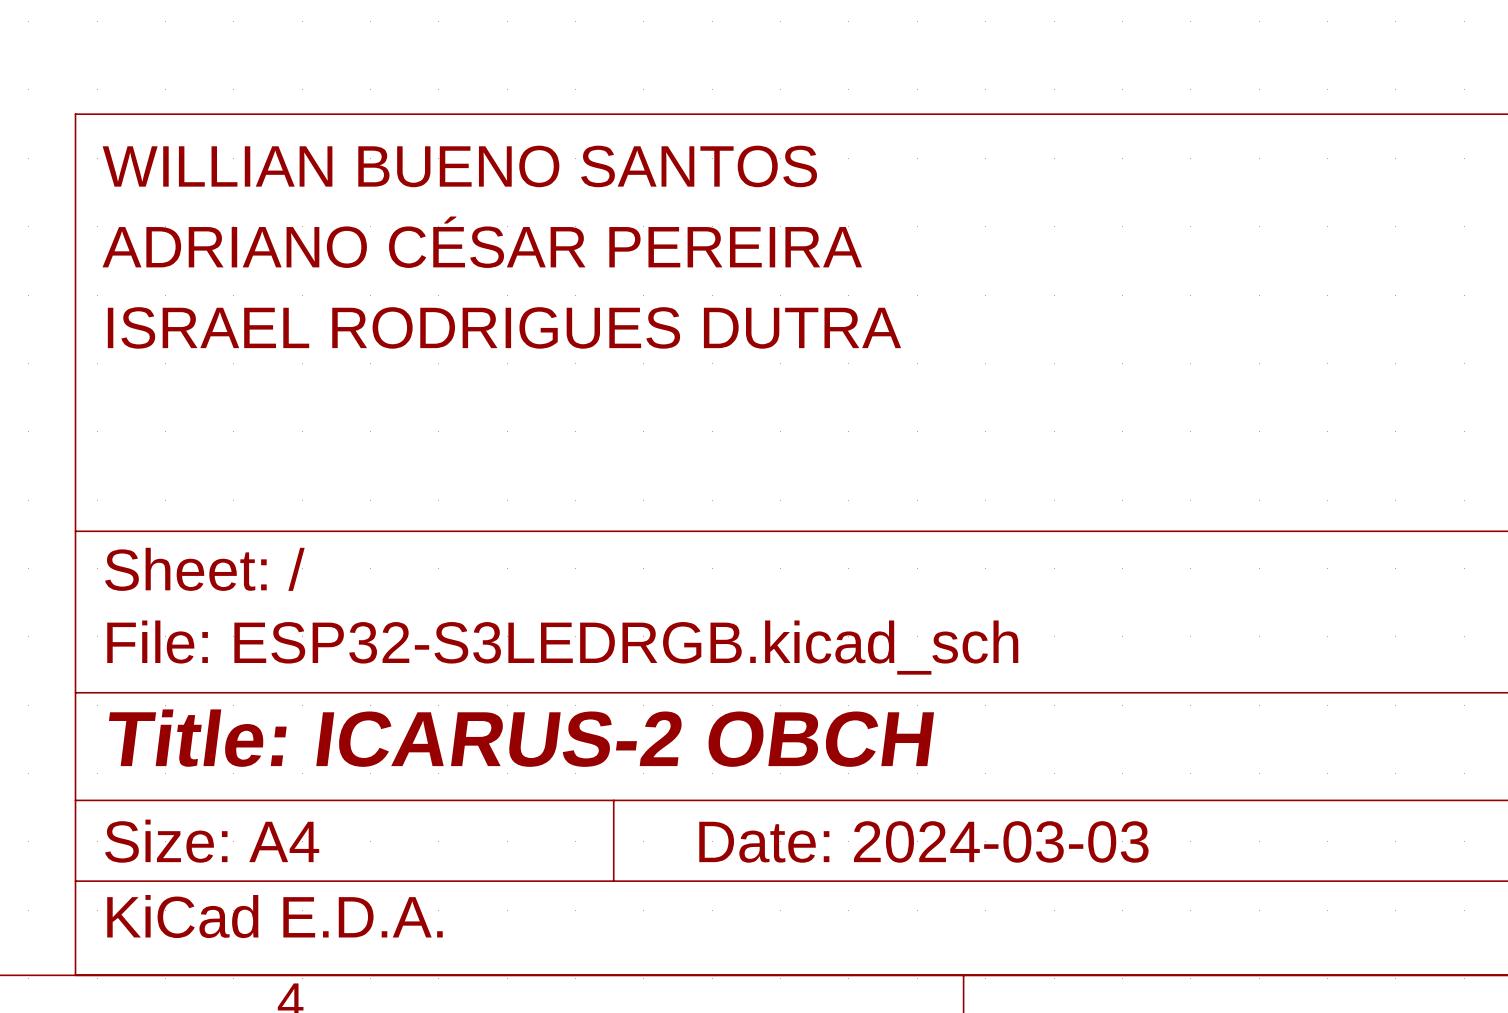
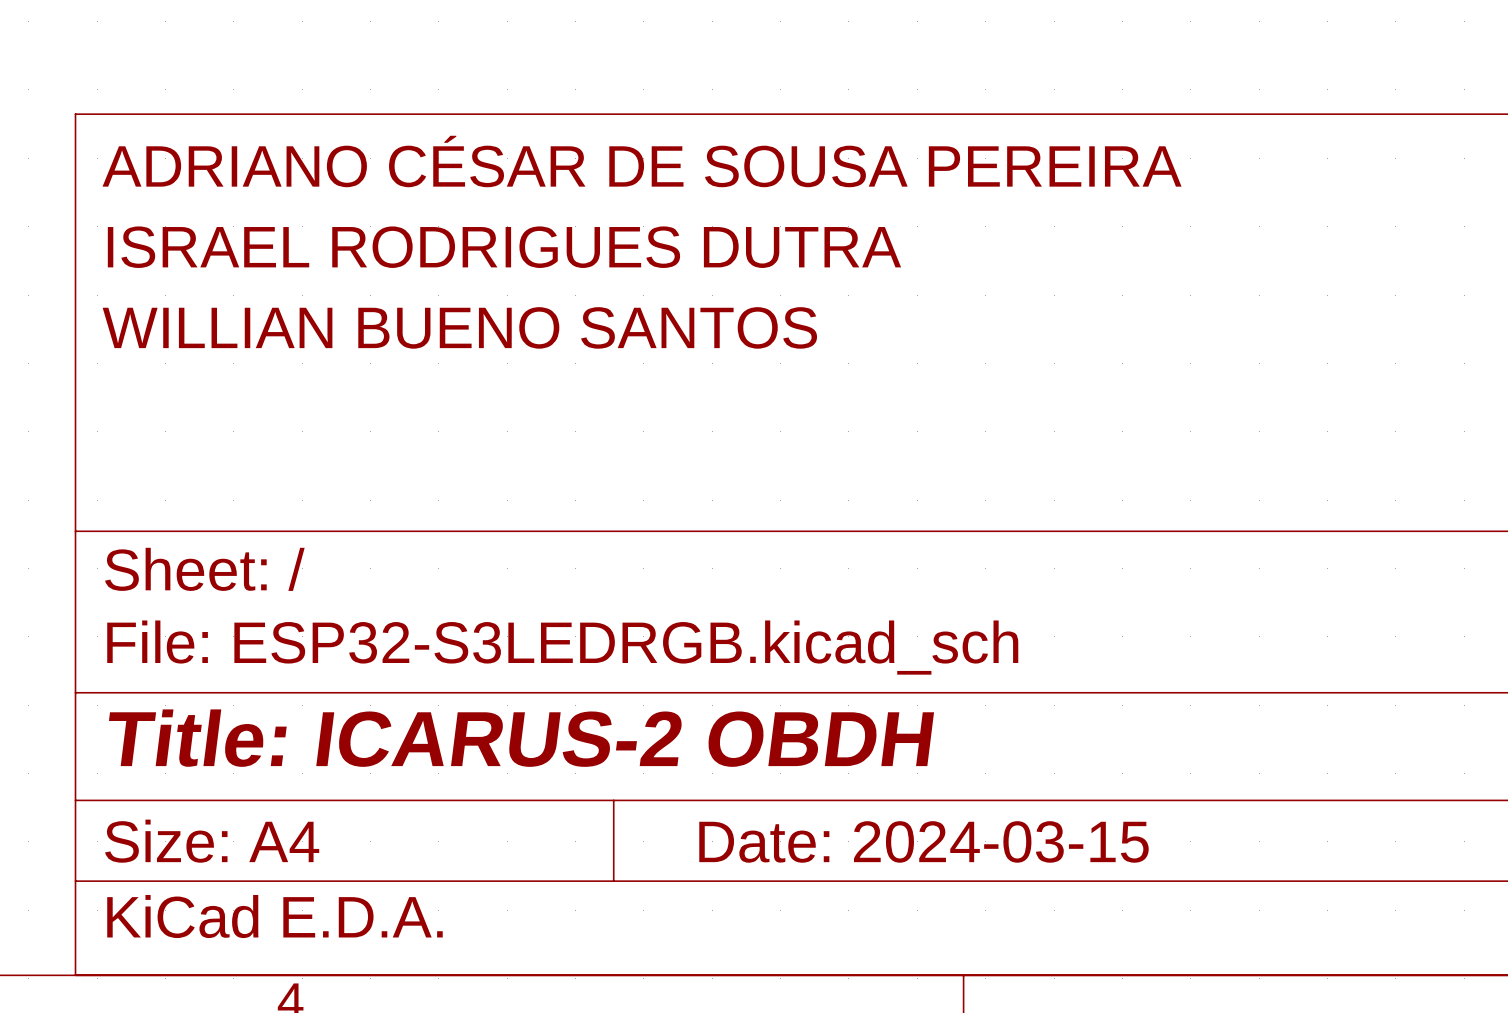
title block: WILLIAN BUENO SANTOS (459, 166) -> ADRIANO CÉSAR DE SOUSA PEREIRA (642, 161)
title block: ADRIANO CÉSAR PEREIRA (482, 242) -> ISRAEL RODRIGUES DUTRA (504, 247)
title block: ISRAEL RODRIGUES DUTRA (504, 327) -> WILLIAN BUENO SANTOS (459, 327)
title block: Title: ICARUS-2 OBCH (521, 738) -> Title: ICARUS-2 OBDH (521, 738)
title block: Date: 2024-03-03 (923, 841) -> Date: 2024-03-15 (923, 841)

